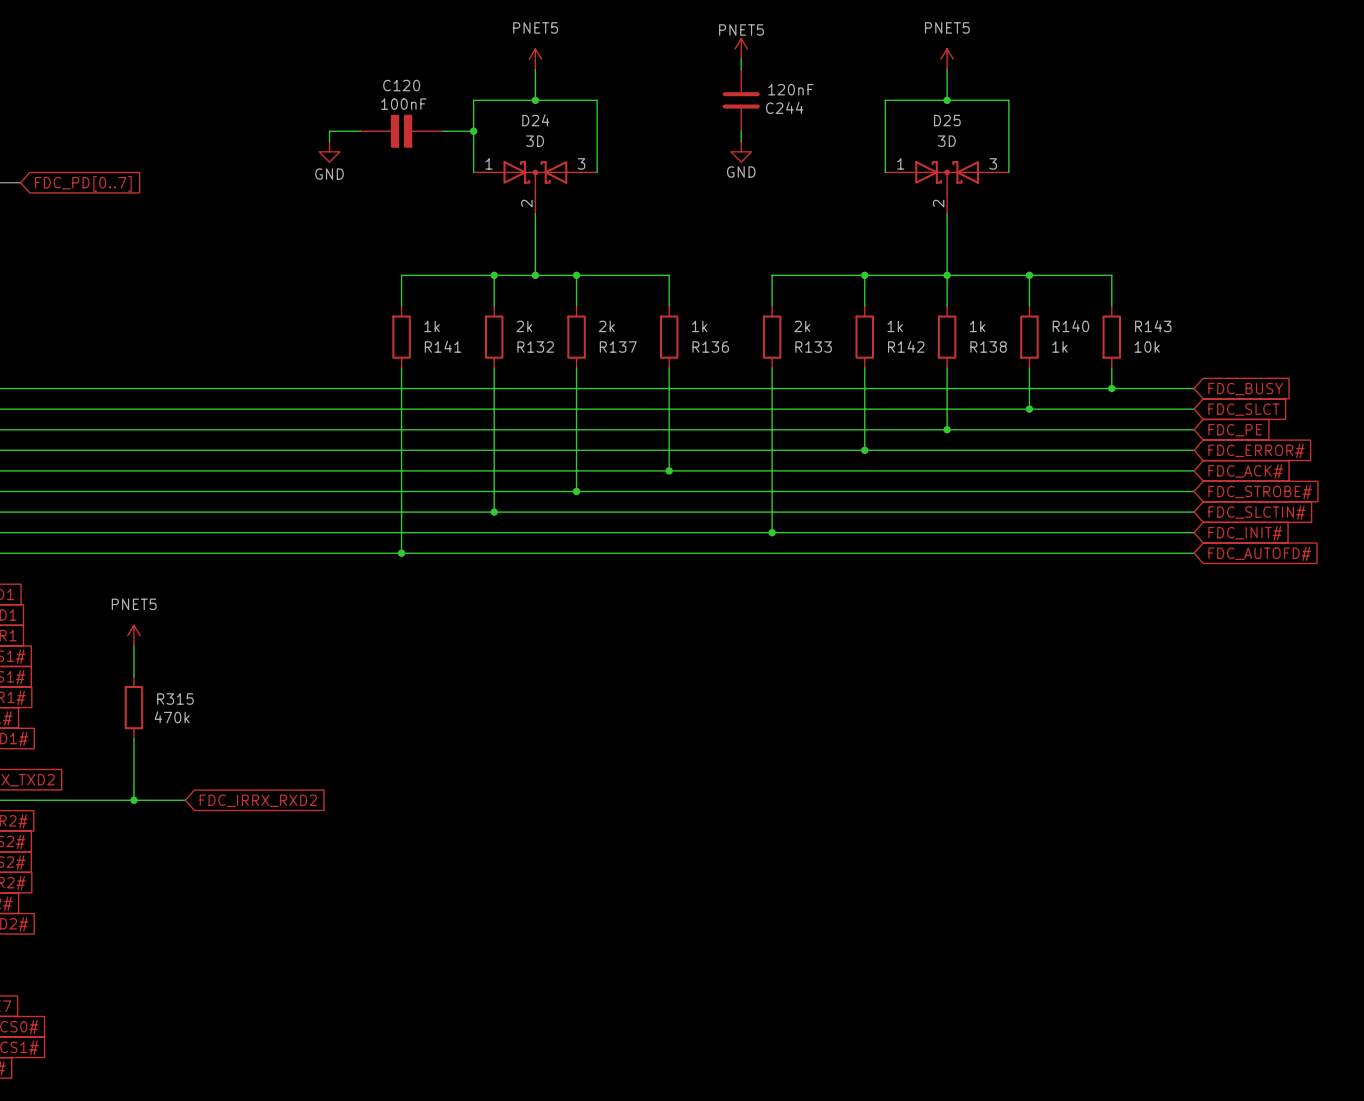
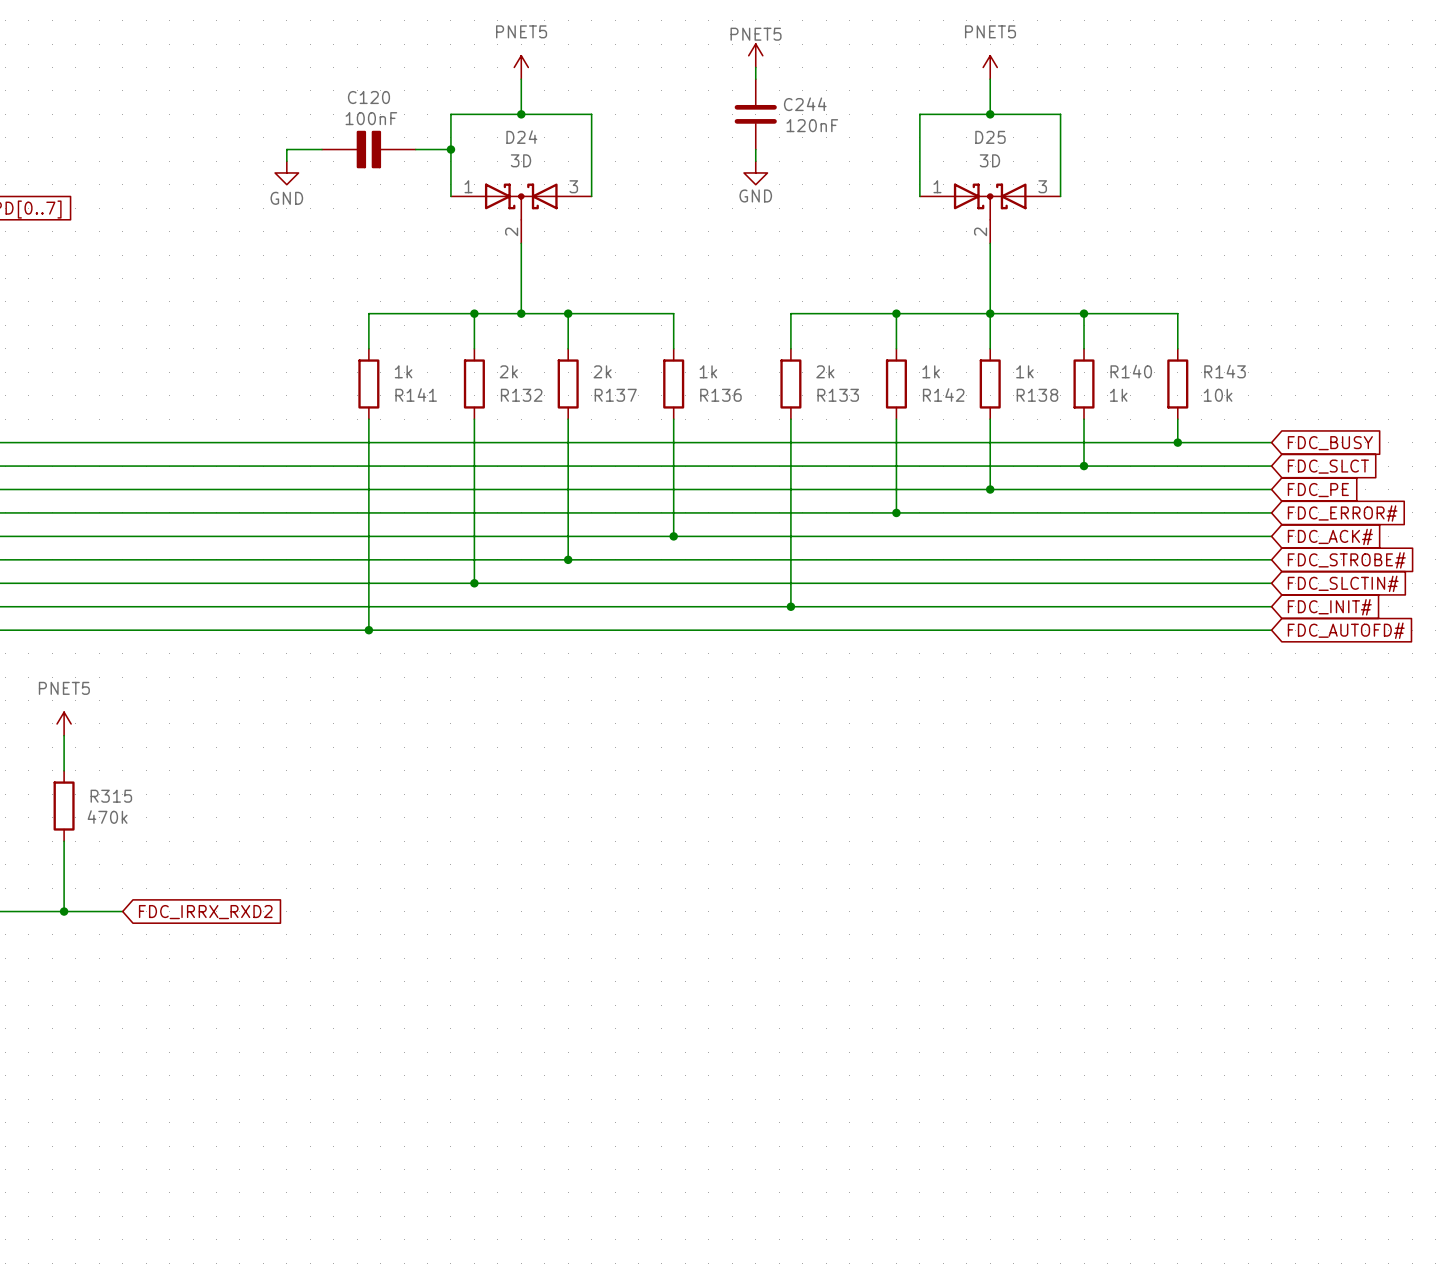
C244 value position: 120nF (790, 89) -> 120nF (812, 125)
C244 name position: C244 (784, 107) -> C244 (805, 104)

